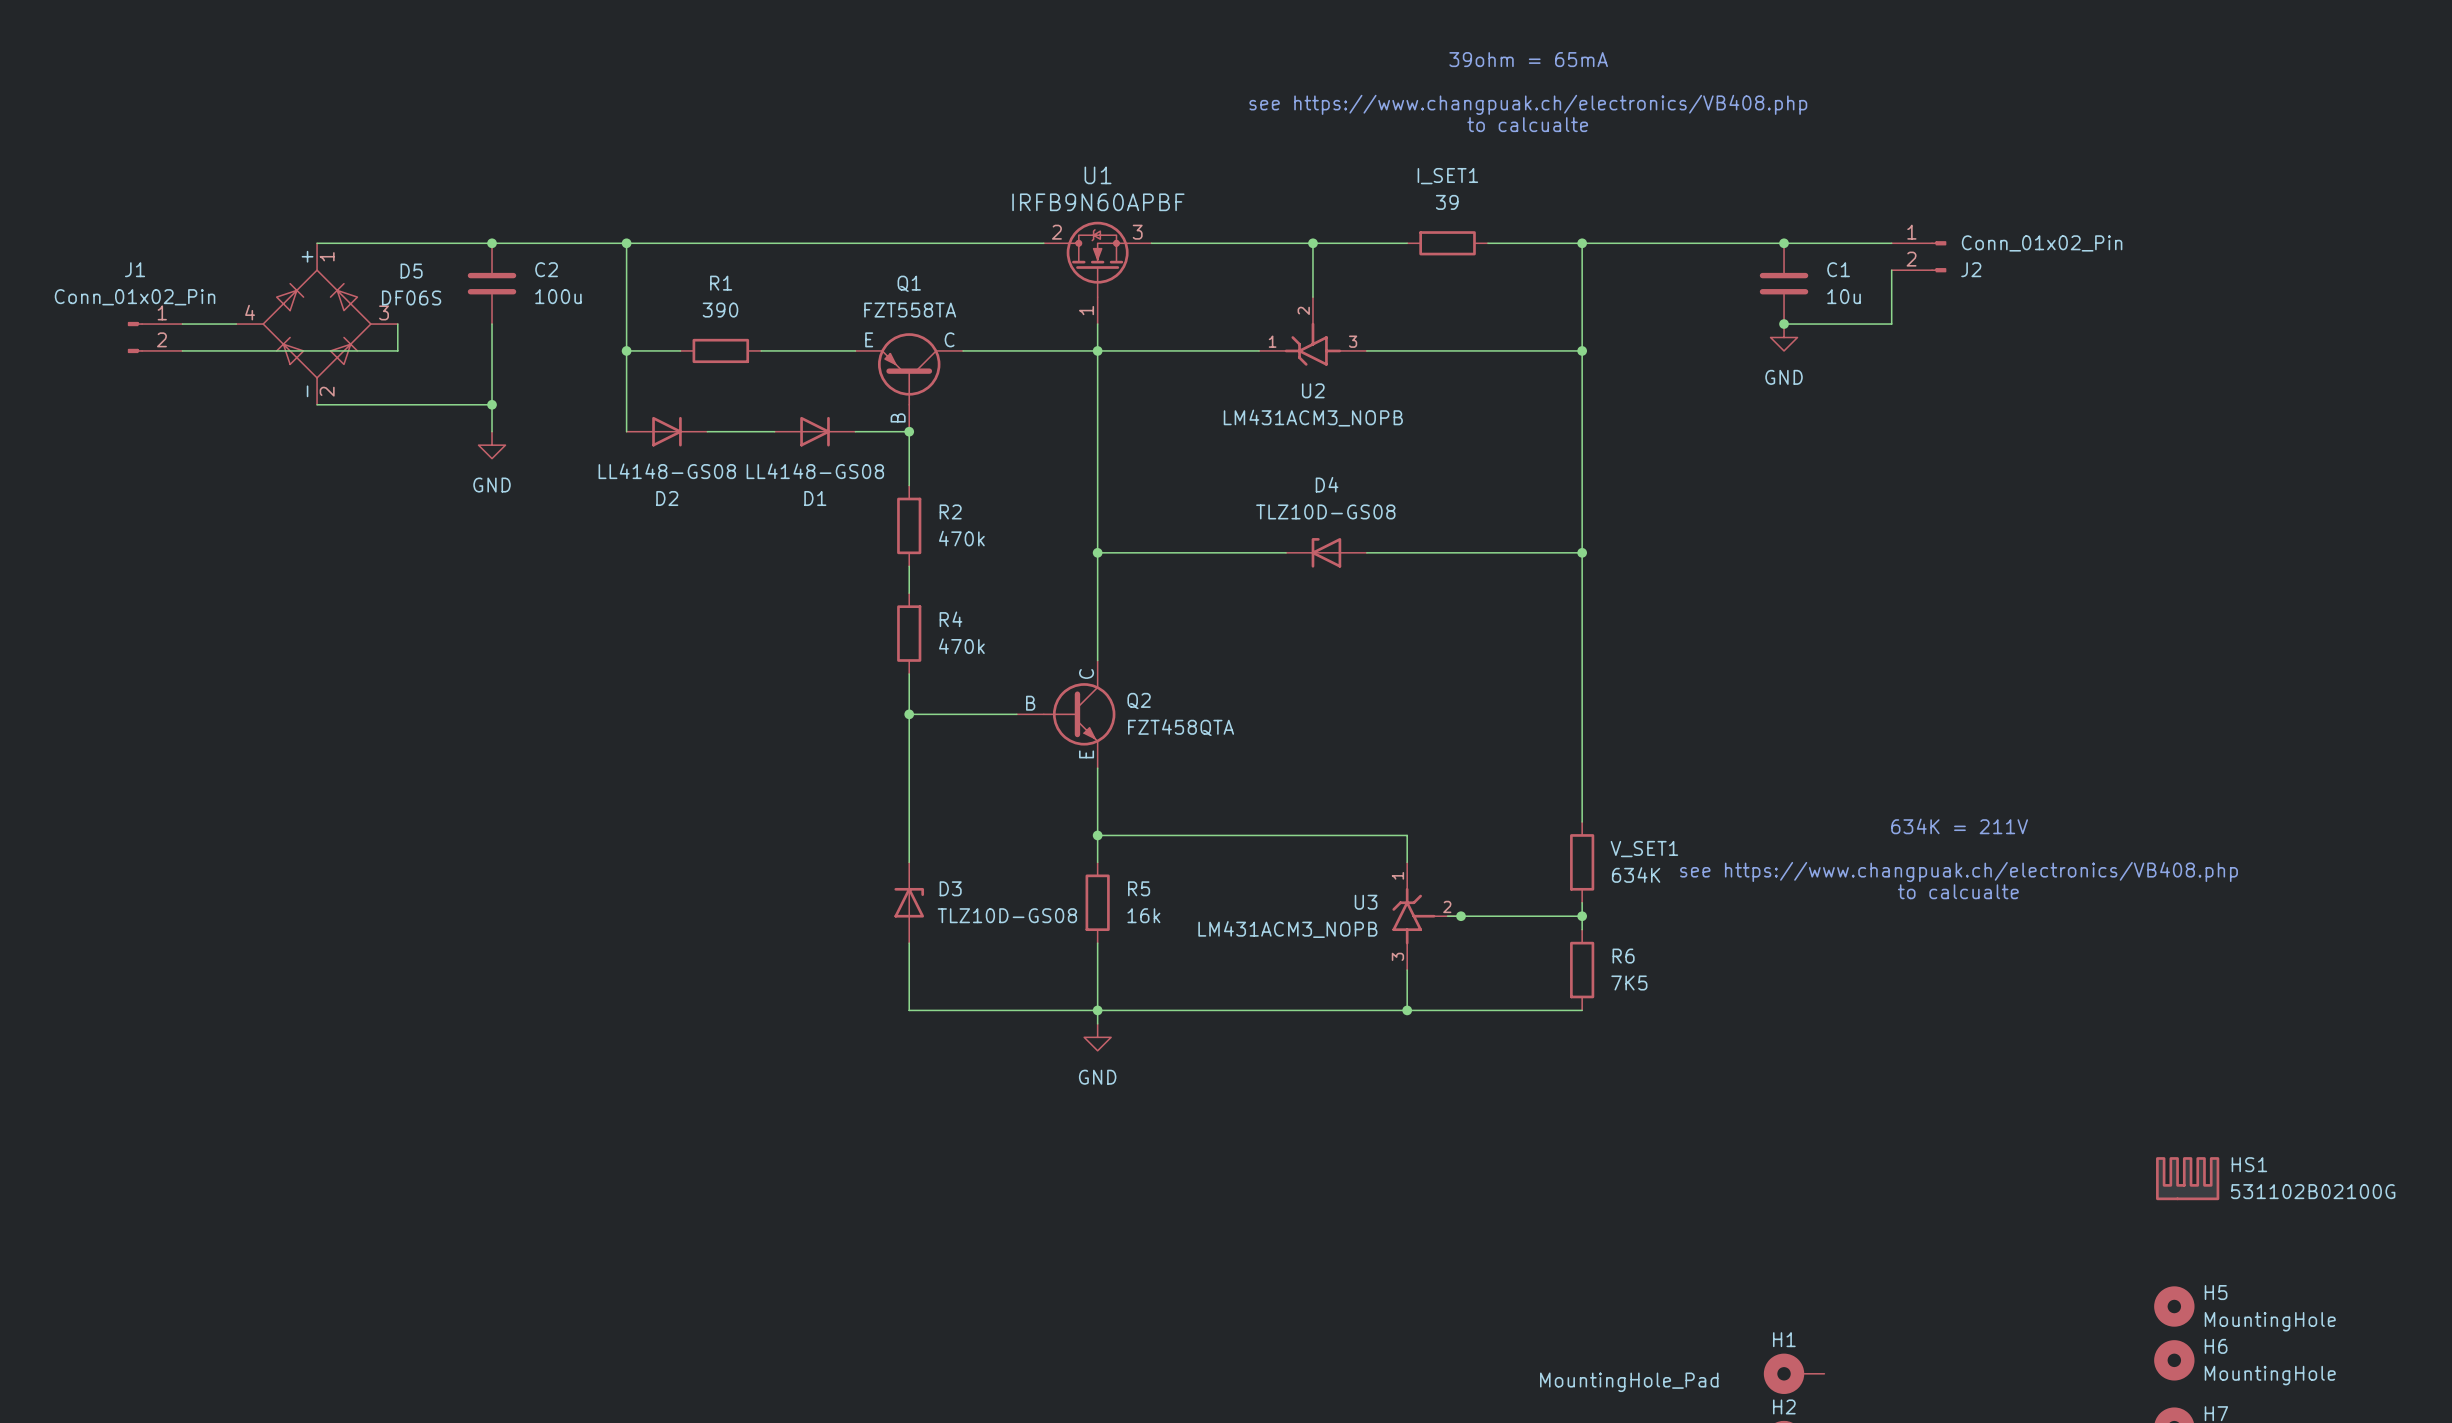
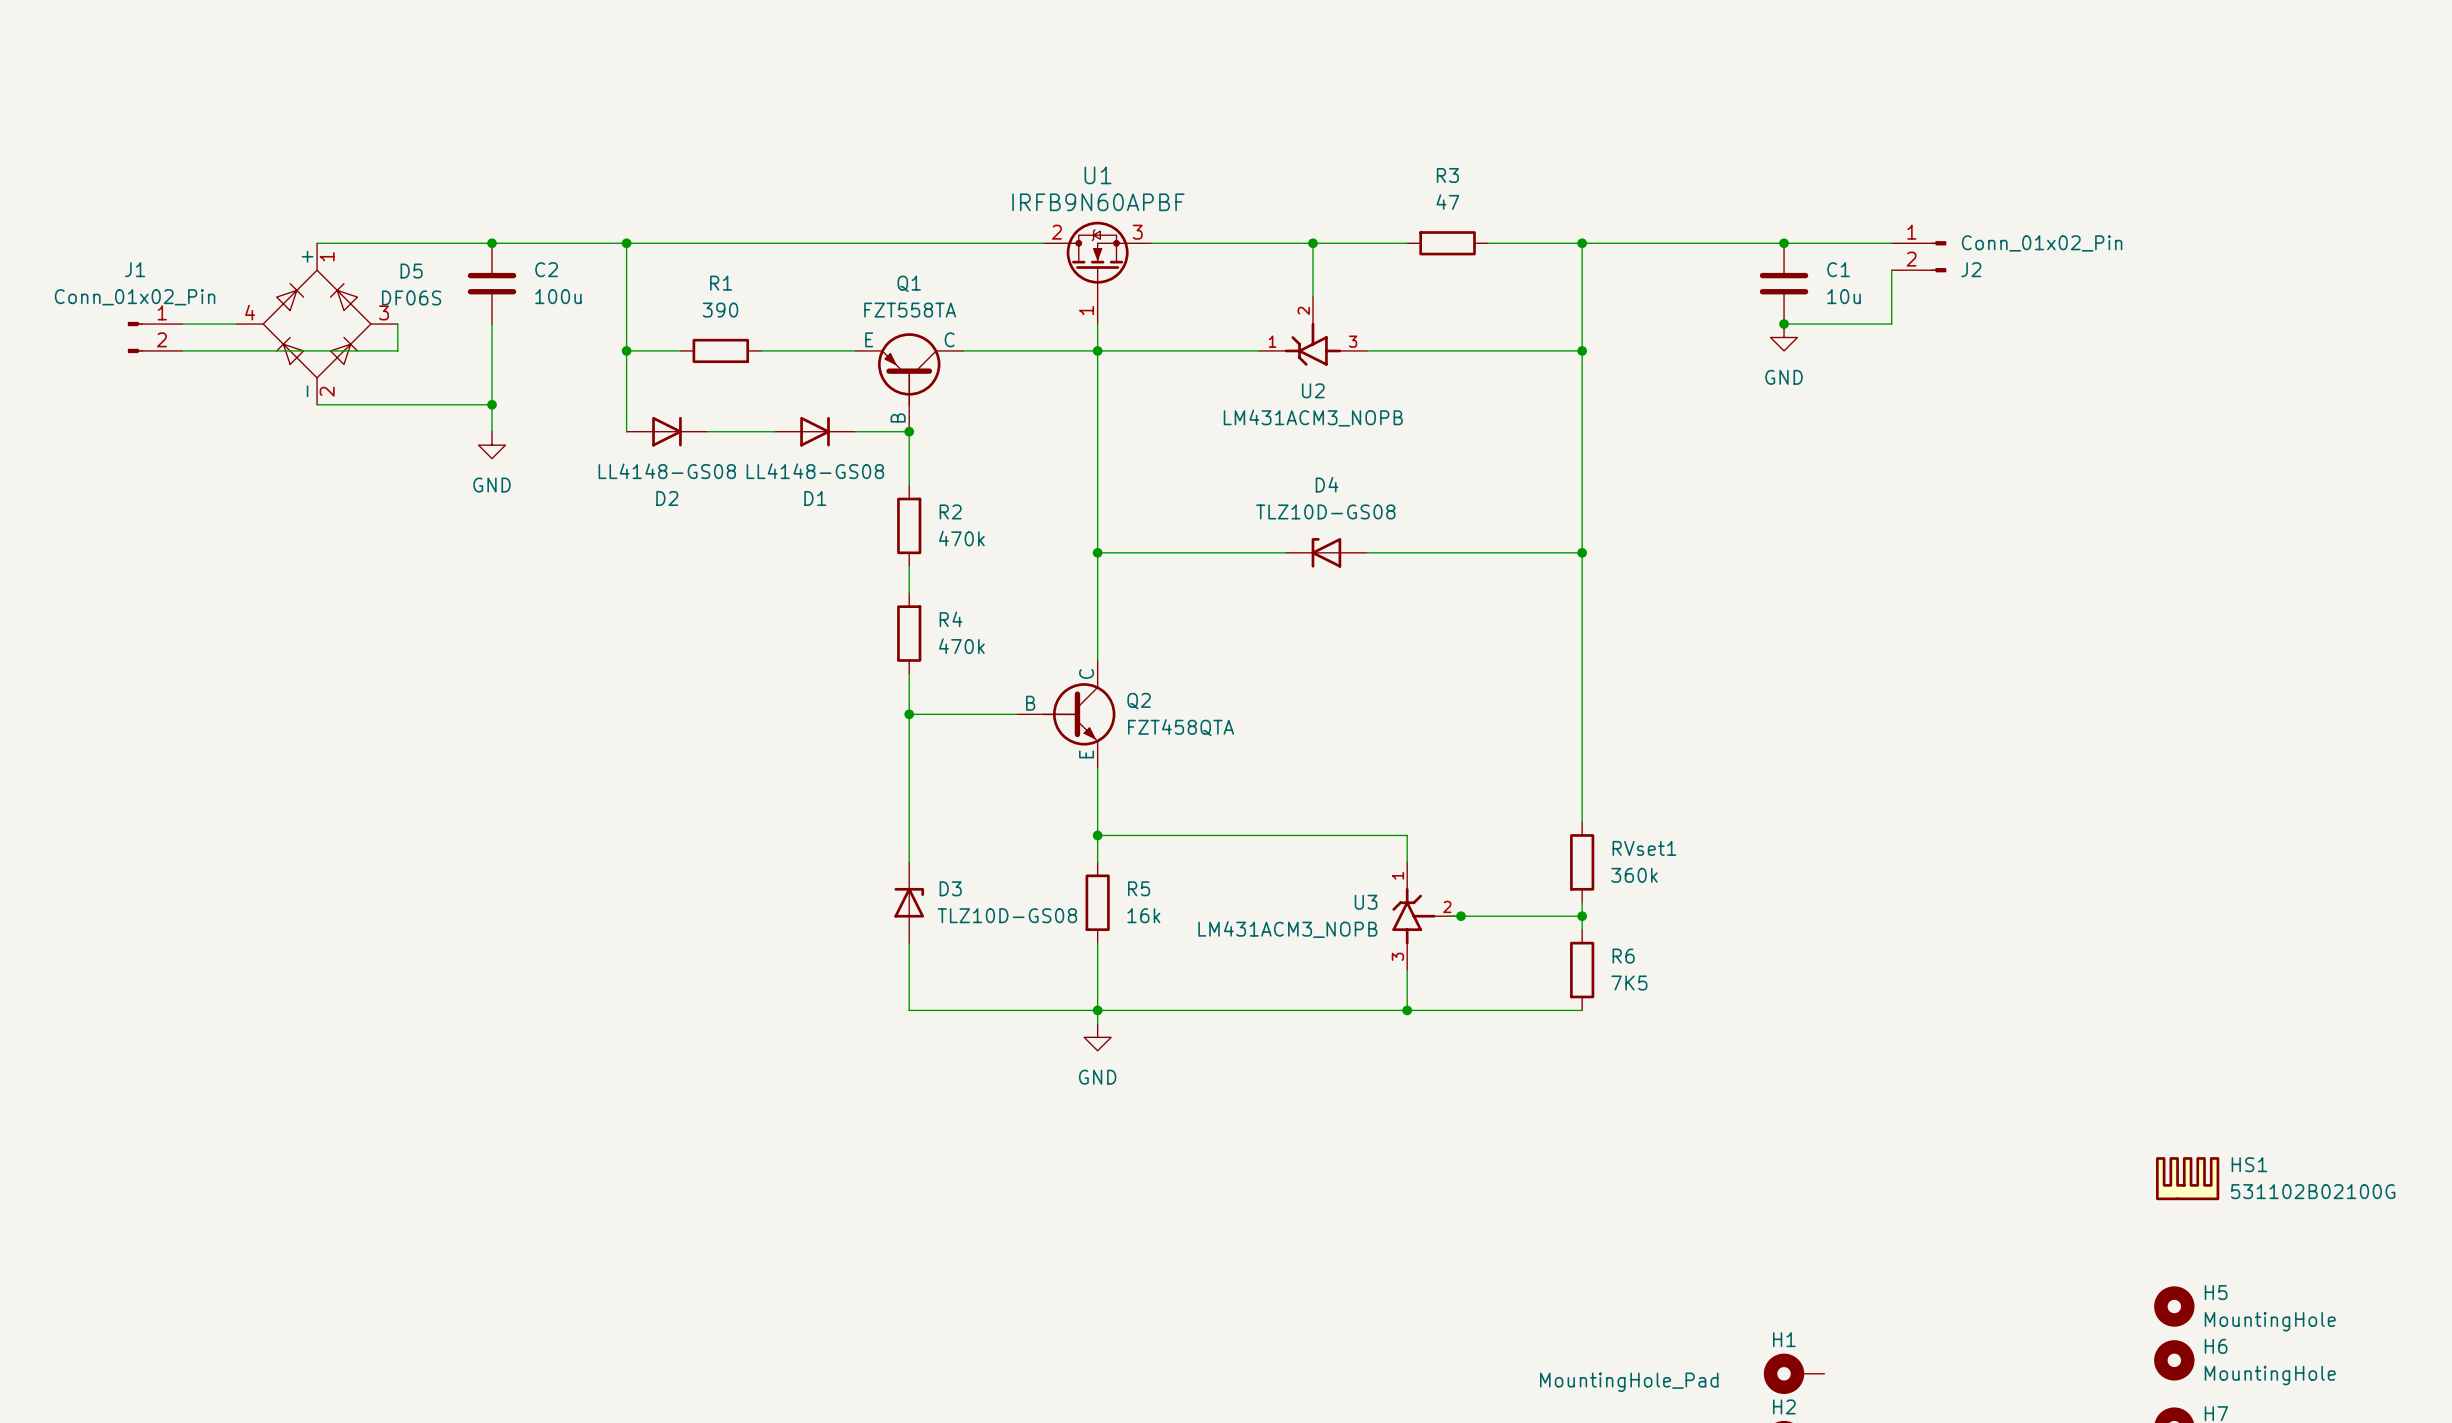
text: 39ohm = 65mA (1528, 59) -> none
text: see https://www.changpuak.ch/electronics/VB408.php (1528, 104) -> none
text: to calcualte (1527, 124) -> none
I_SET1 name: I_SET1 (1447, 176) -> R3 (1447, 175)
I_SET1 value: 39 (1447, 202) -> 47 (1447, 202)
text: 634K = 211V (1959, 826) -> none
V_SET1 name: V_SET1 (1644, 849) -> RVset1 (1644, 848)
text: see https://www.changpuak.ch/electronics/VB408.php (1958, 871) -> none
V_SET1 value: 634K (1636, 875) -> 360k (1634, 875)
text: to calcualte (1958, 891) -> none

